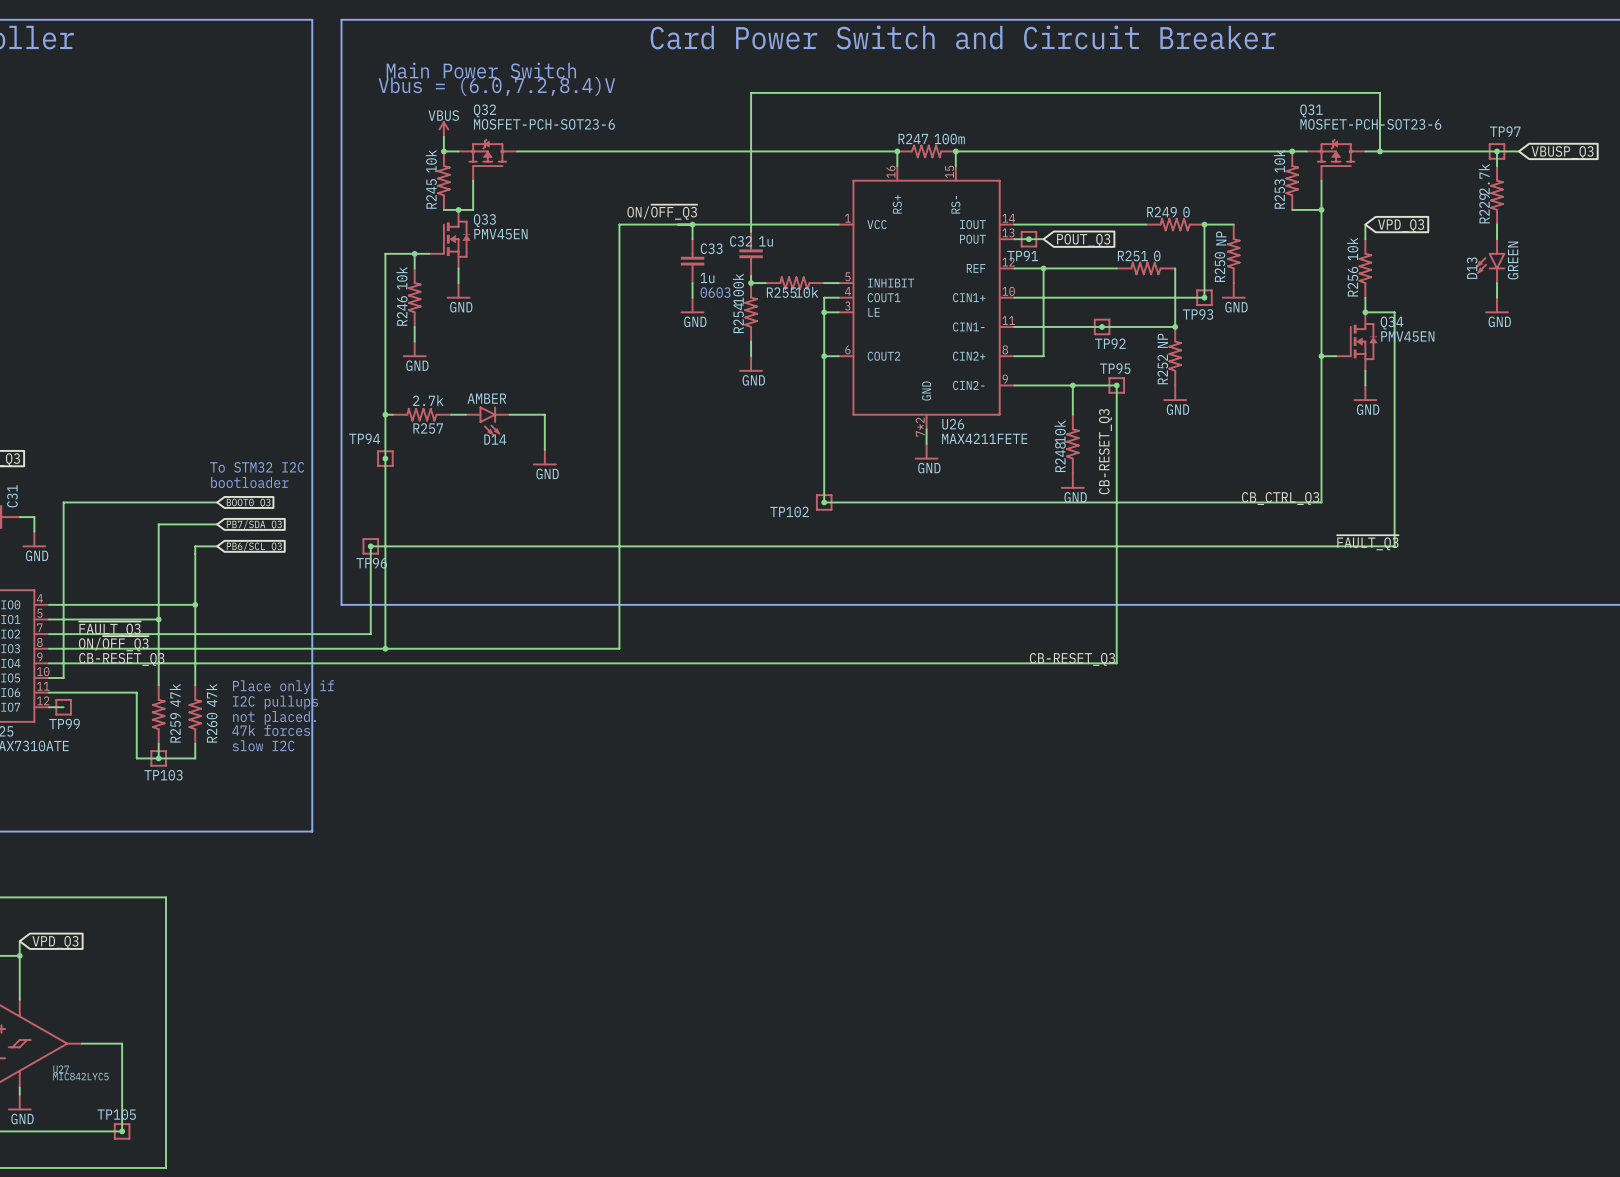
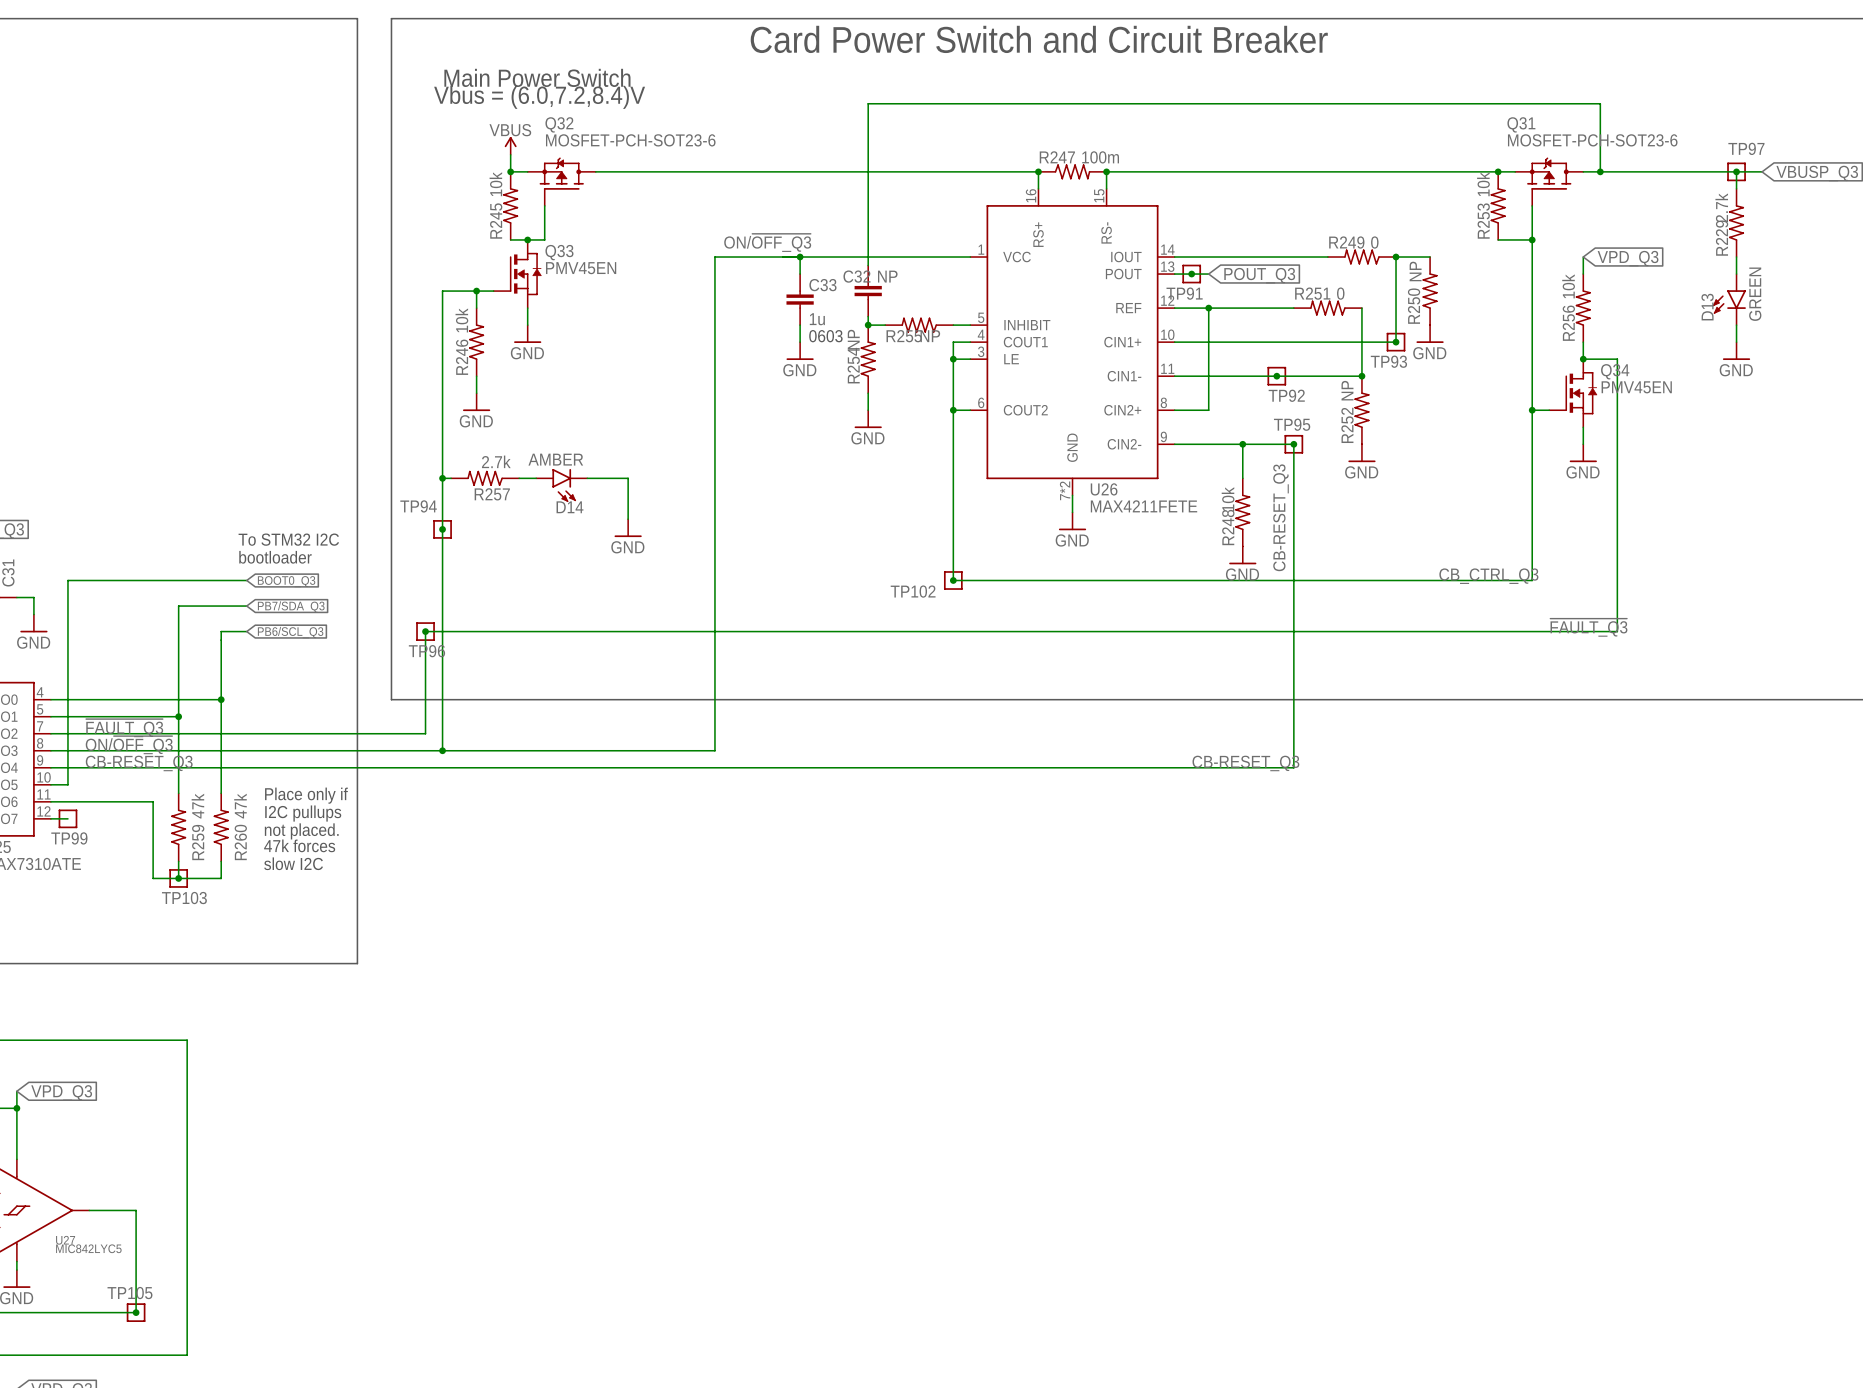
C32 value: 1u (766, 241) -> NP (887, 276)
R254 value: 100k (738, 288) -> NP (853, 339)
R255 value: 10k (807, 292) -> NP (930, 336)

